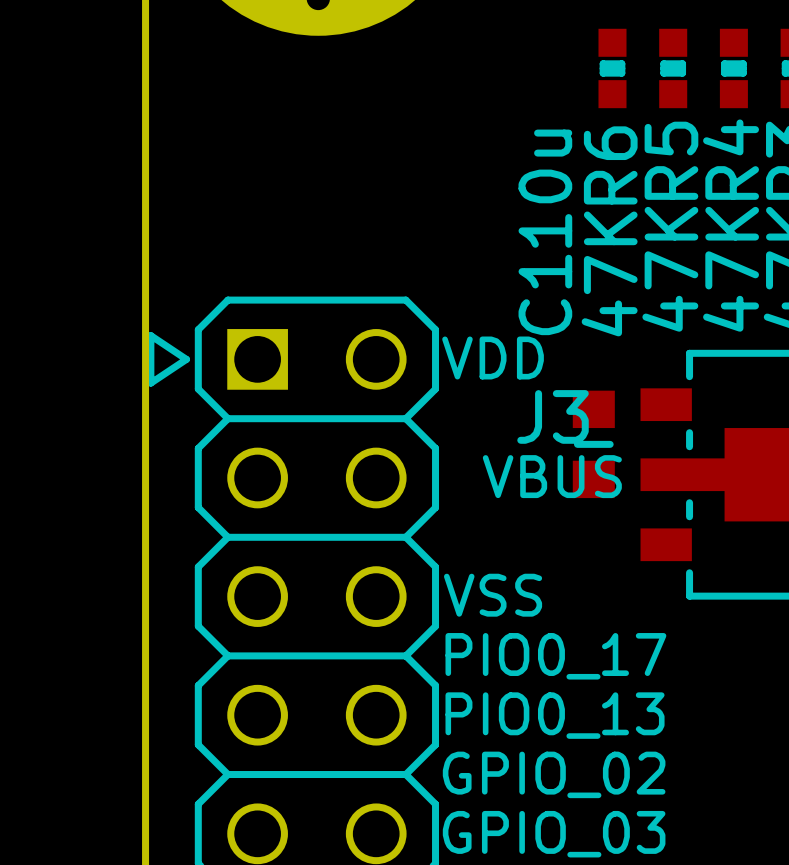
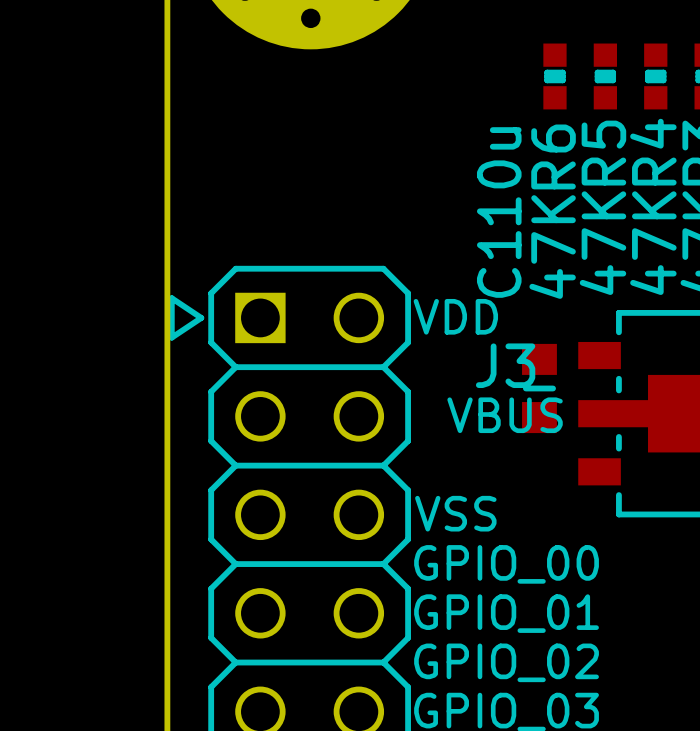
J3 text: PIO0_17 (555, 656) -> GPIO_00 (506, 564)
J3 text: PIO0_13 (555, 715) -> GPIO_01 (506, 613)

